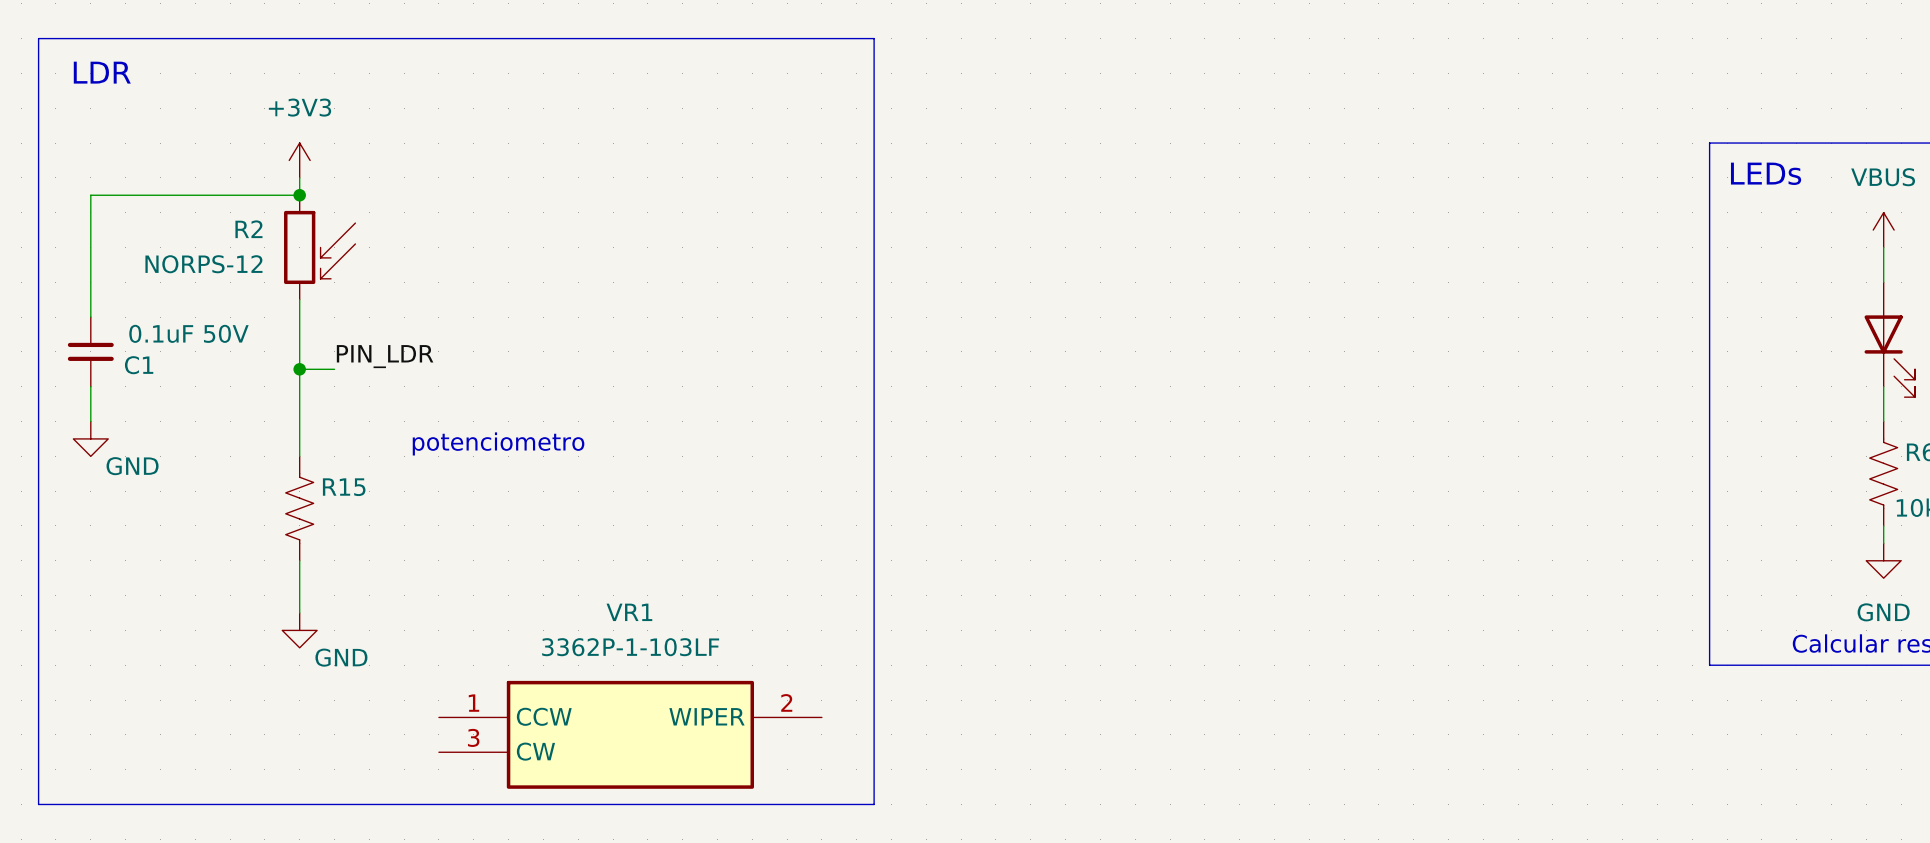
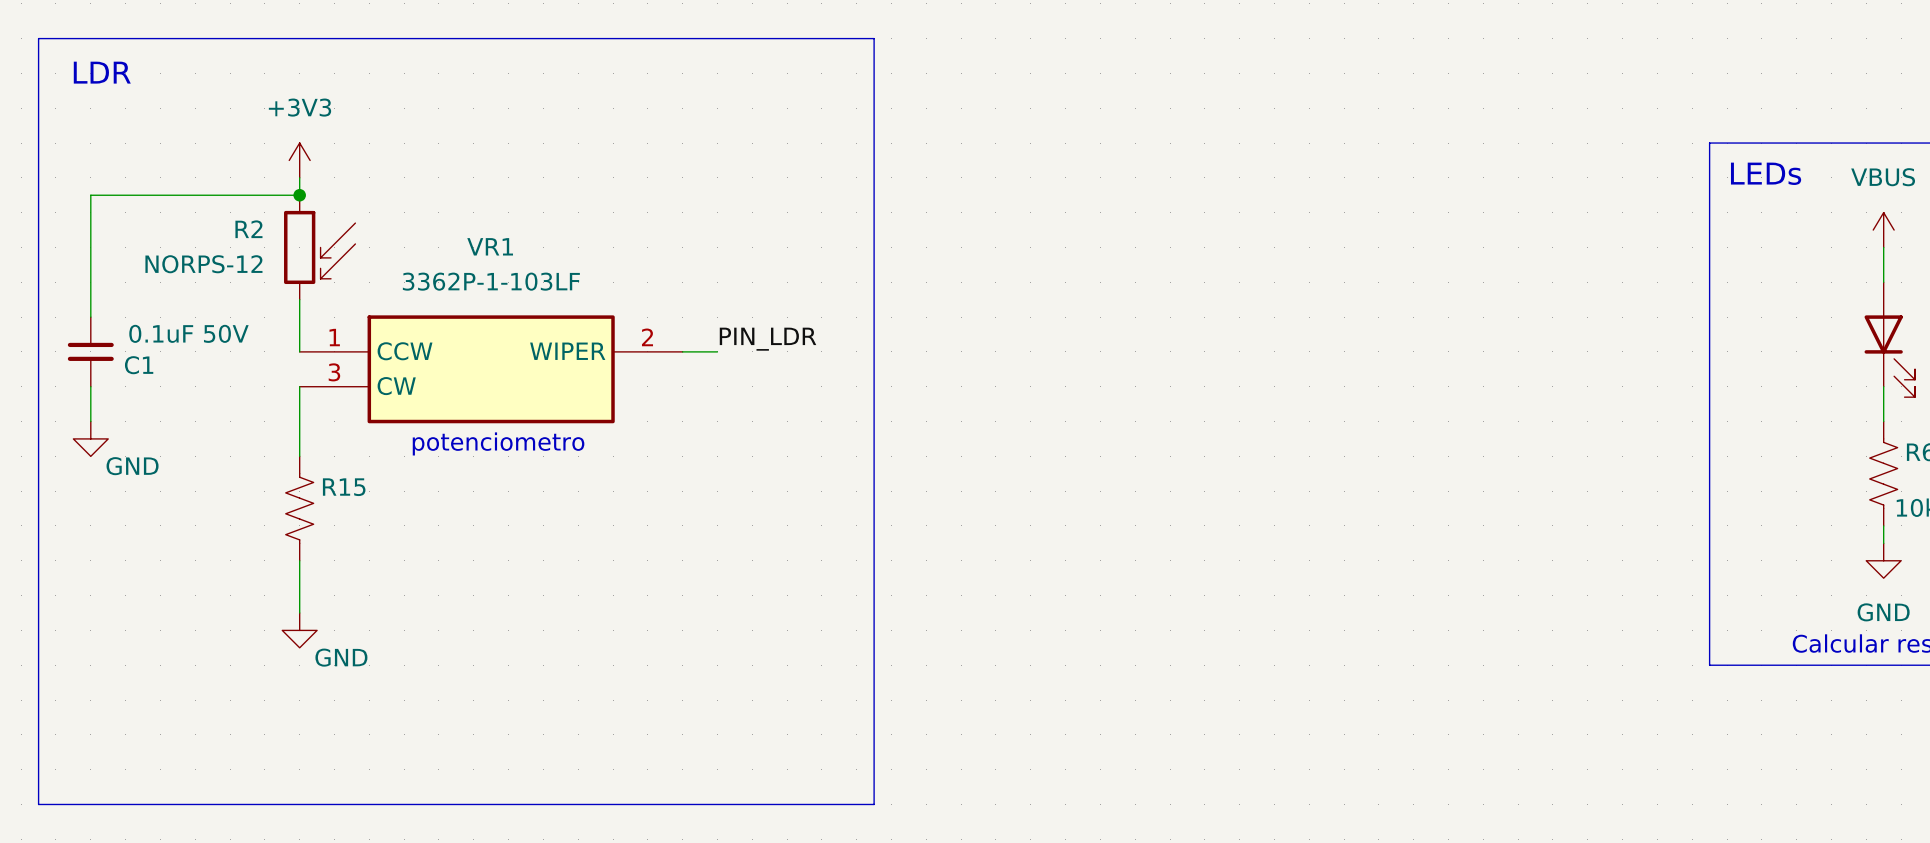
label: none -> PIN_LDR (768, 339)
wire: (299, 351) (299, 386) -> none
wire: none -> (682, 351) (717, 351)
label: PIN_LDR (385, 356) -> none
wire: (299, 369) (334, 369) -> none
junction: (299, 369) -> none
VR1 position: (630, 734) -> (491, 369)

